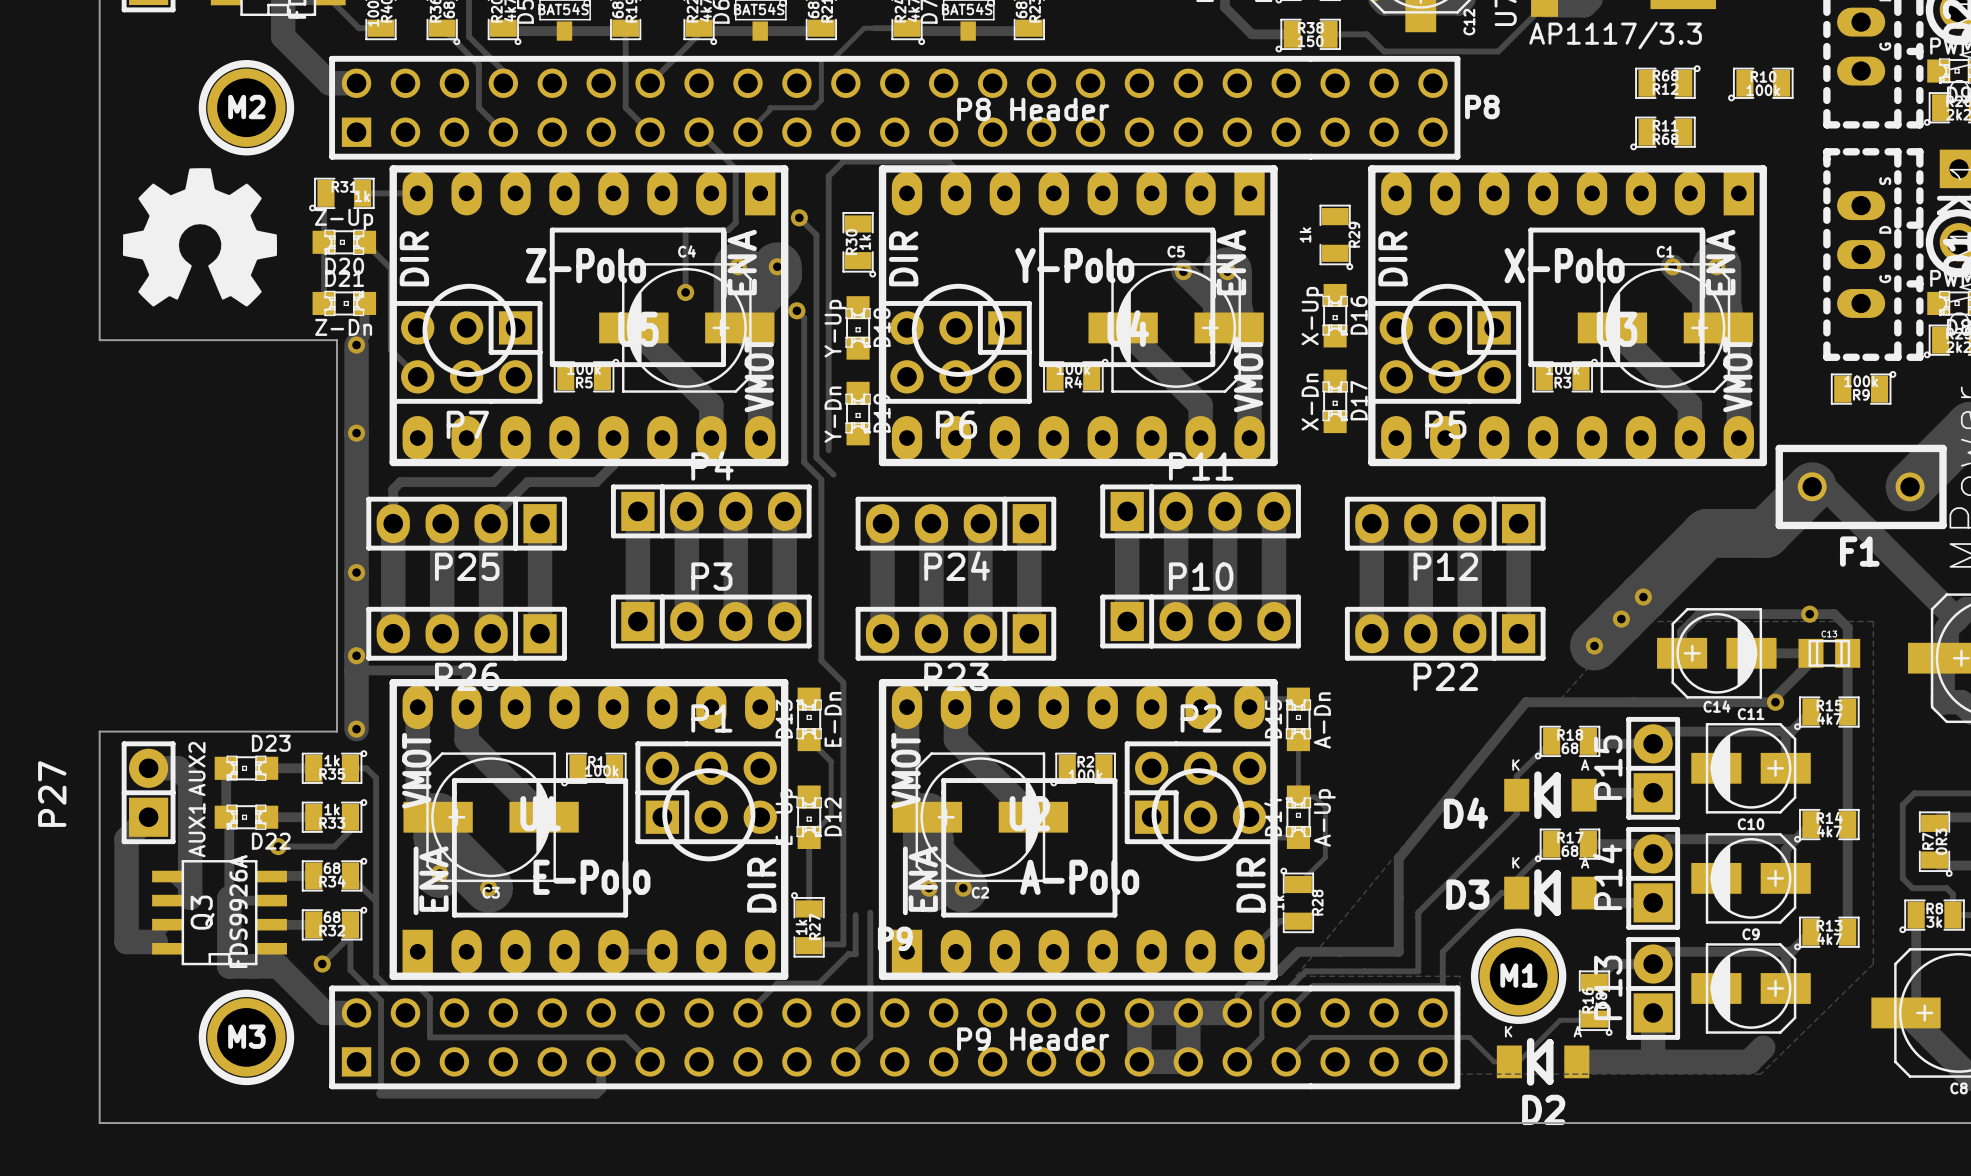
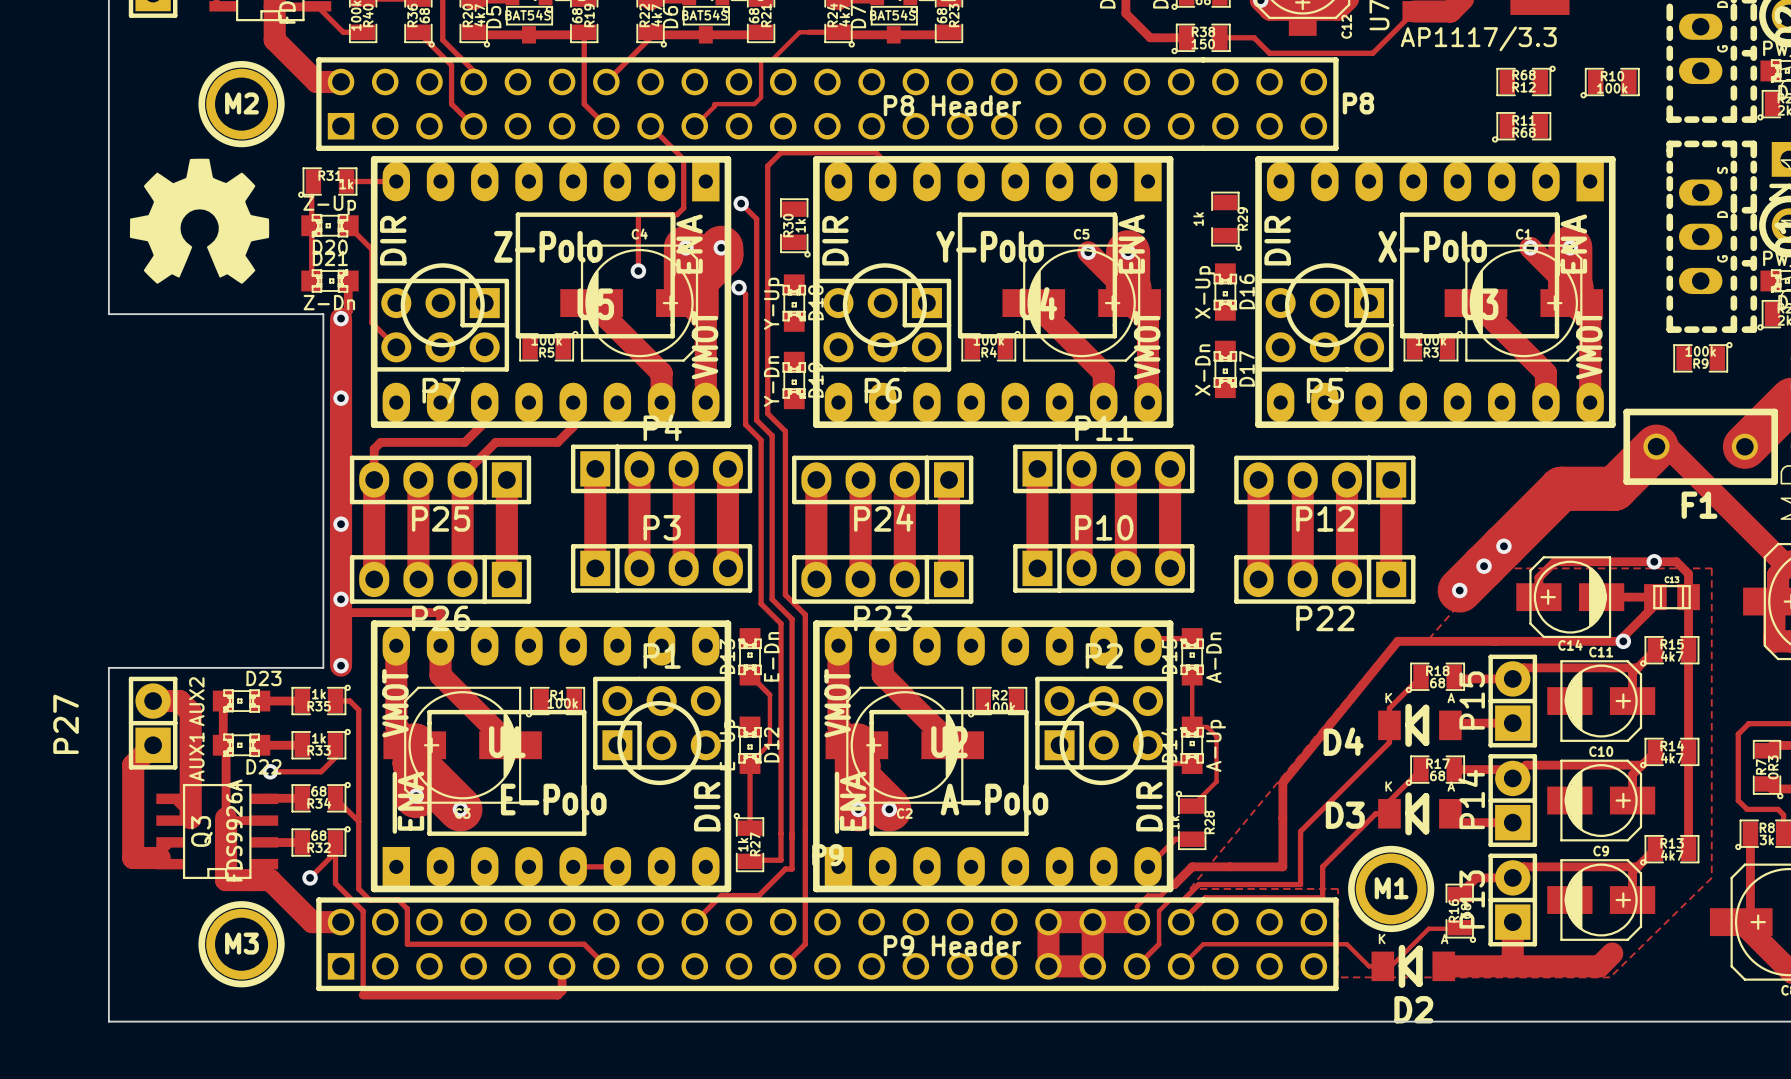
track: none -> (767, 413) (785, 431) (785, 594) (805, 614) (805, 831)
track: none -> (772, 435) (772, 599) (792, 619) (792, 833)

